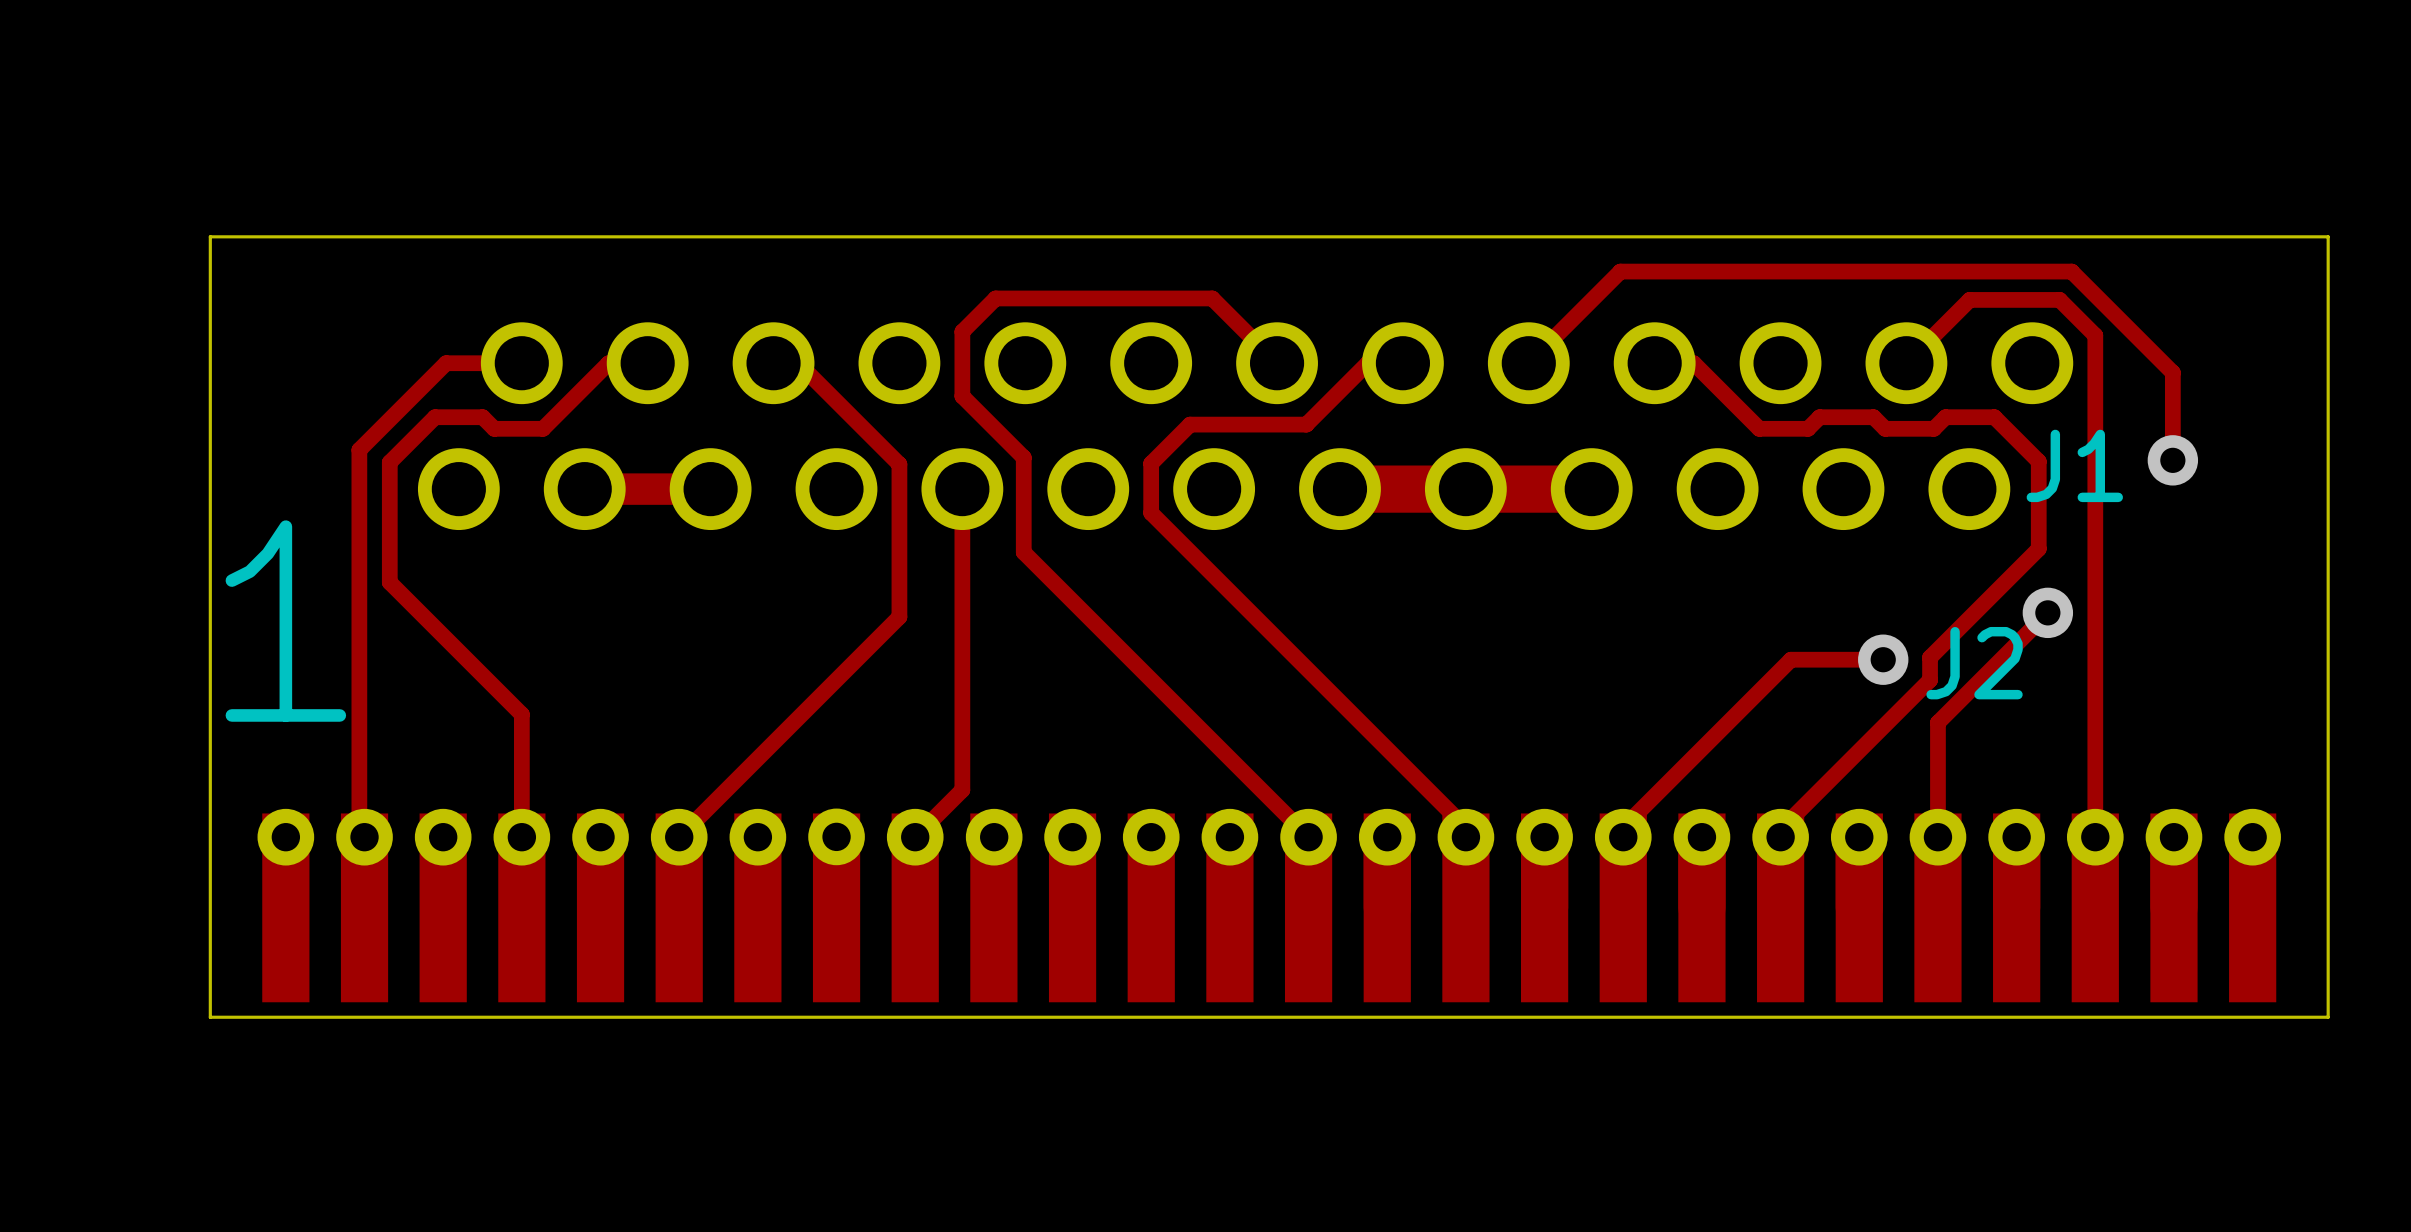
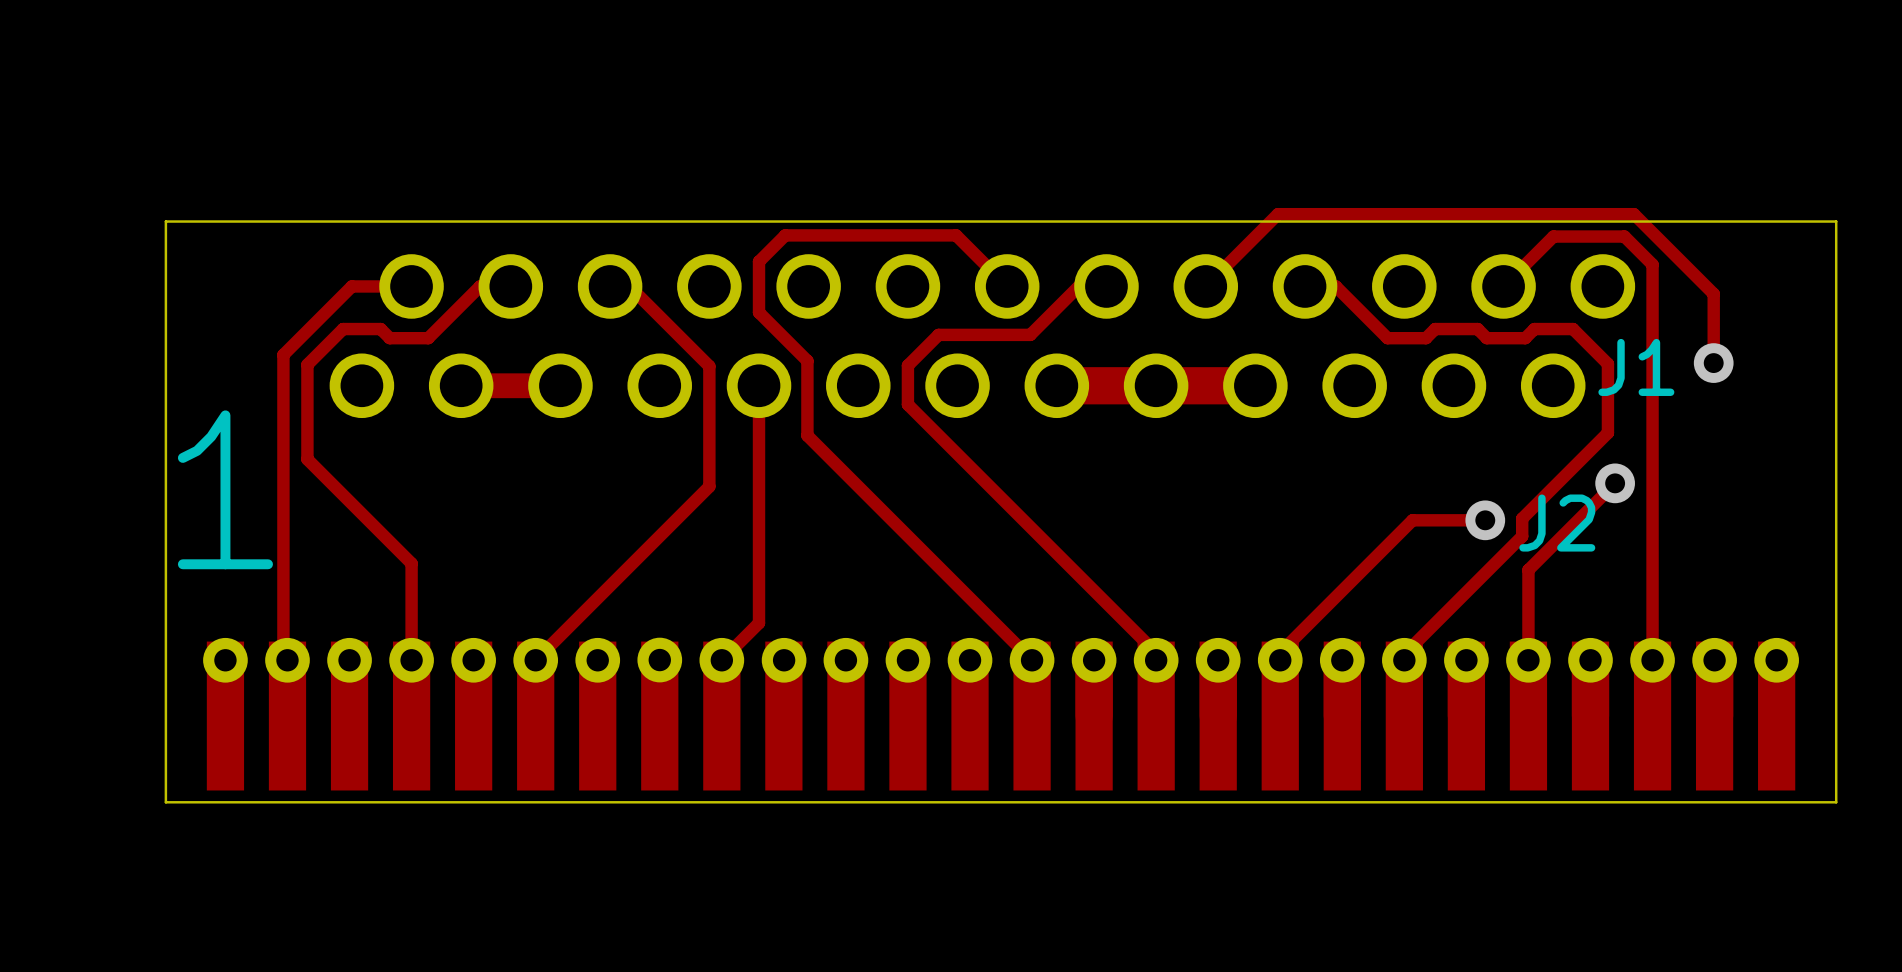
board edge: (210, 280) (210, 236) (2328, 236) (2328, 280) -> (165, 221) (1836, 221)

